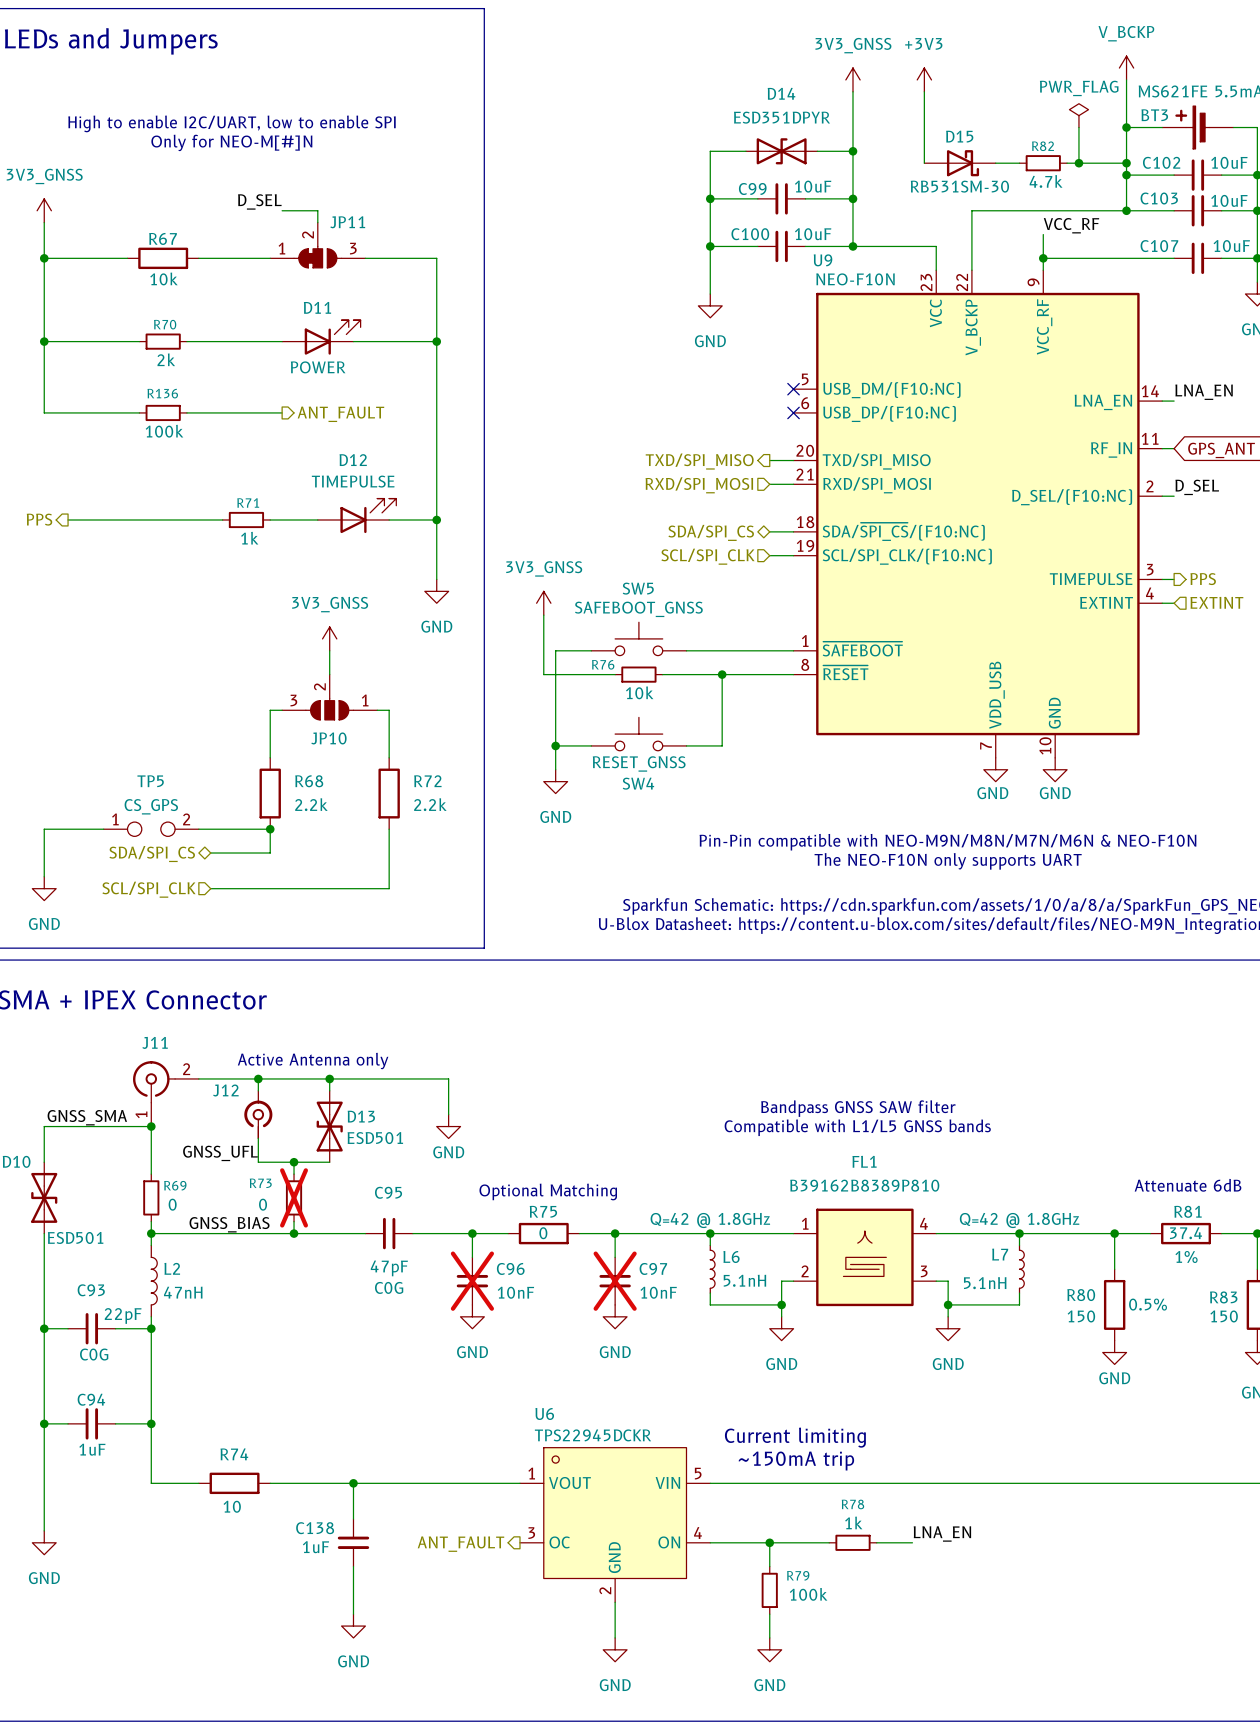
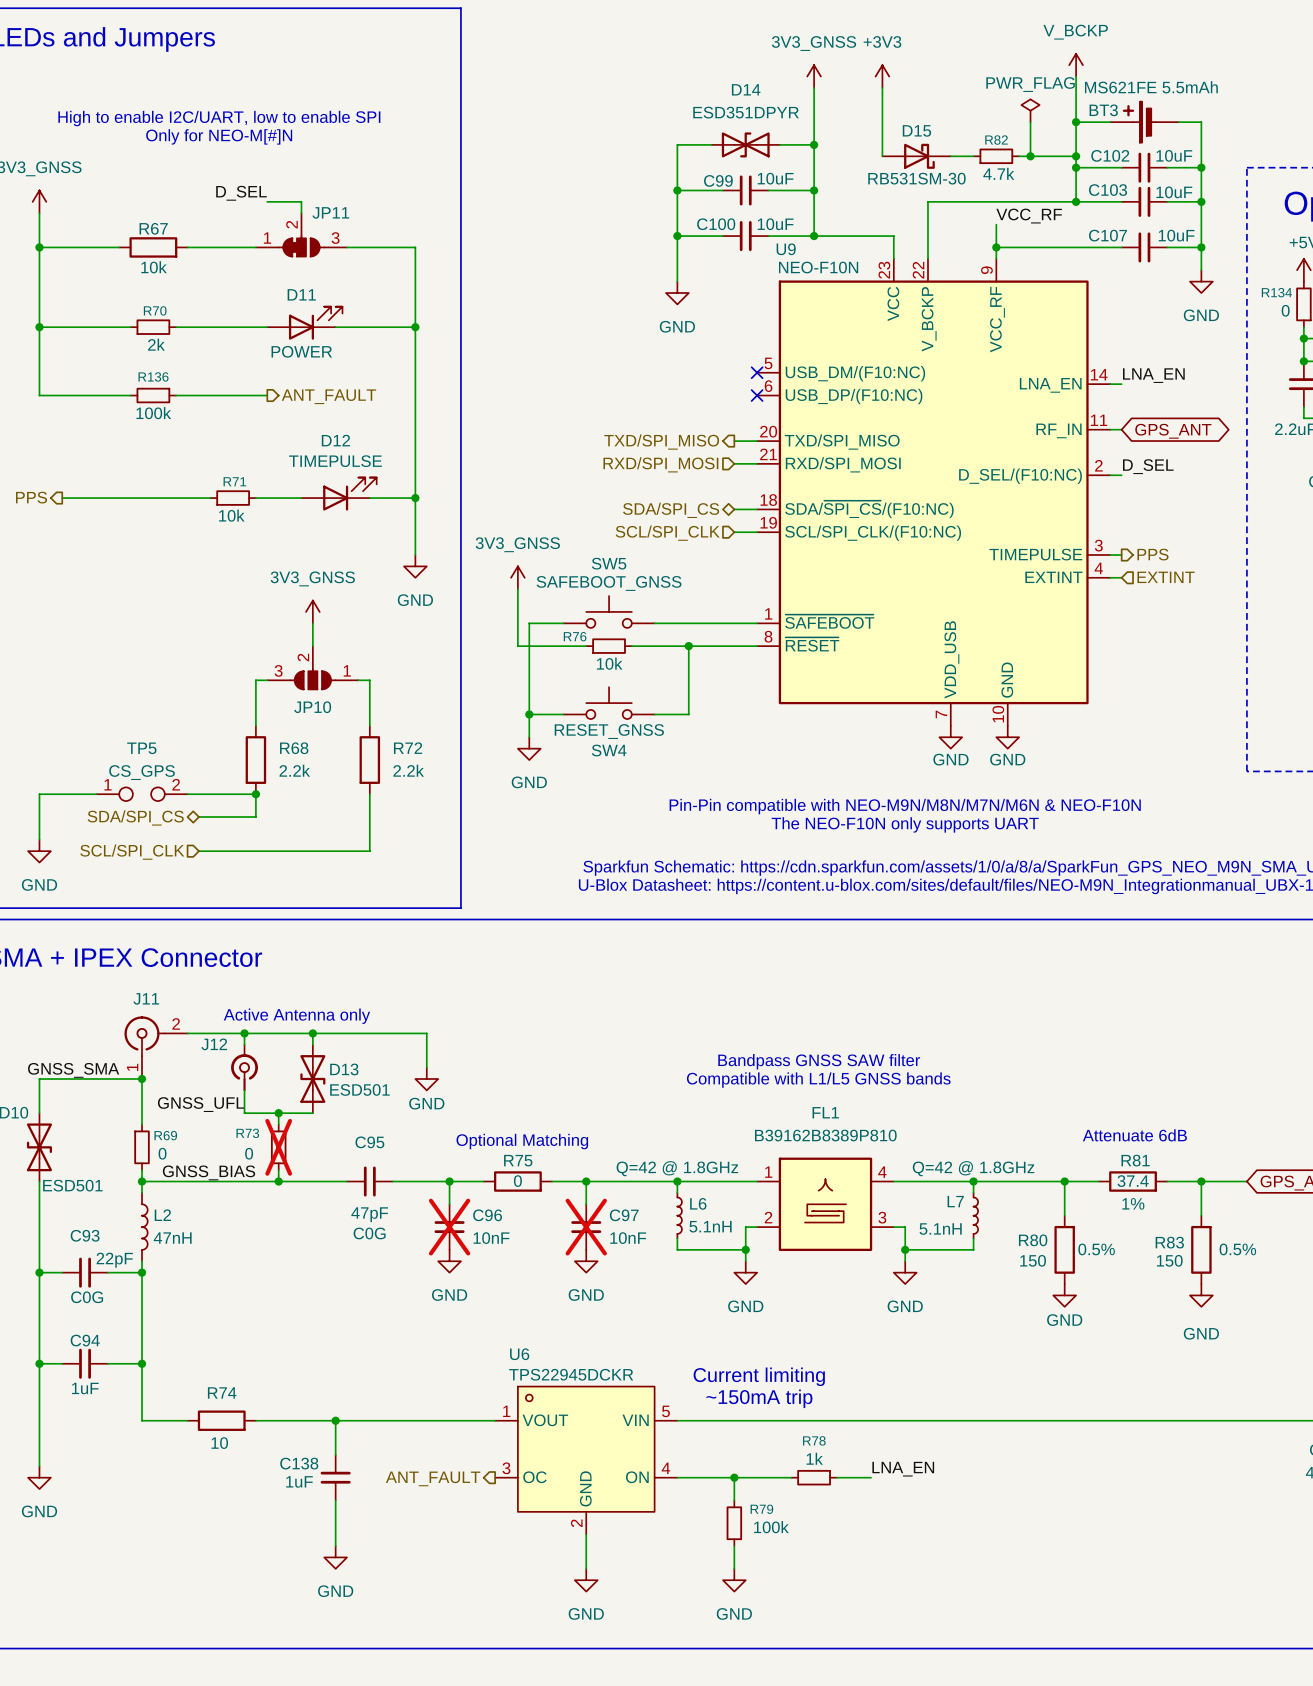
R71 value: 1k (249, 538) -> 10k (231, 515)

